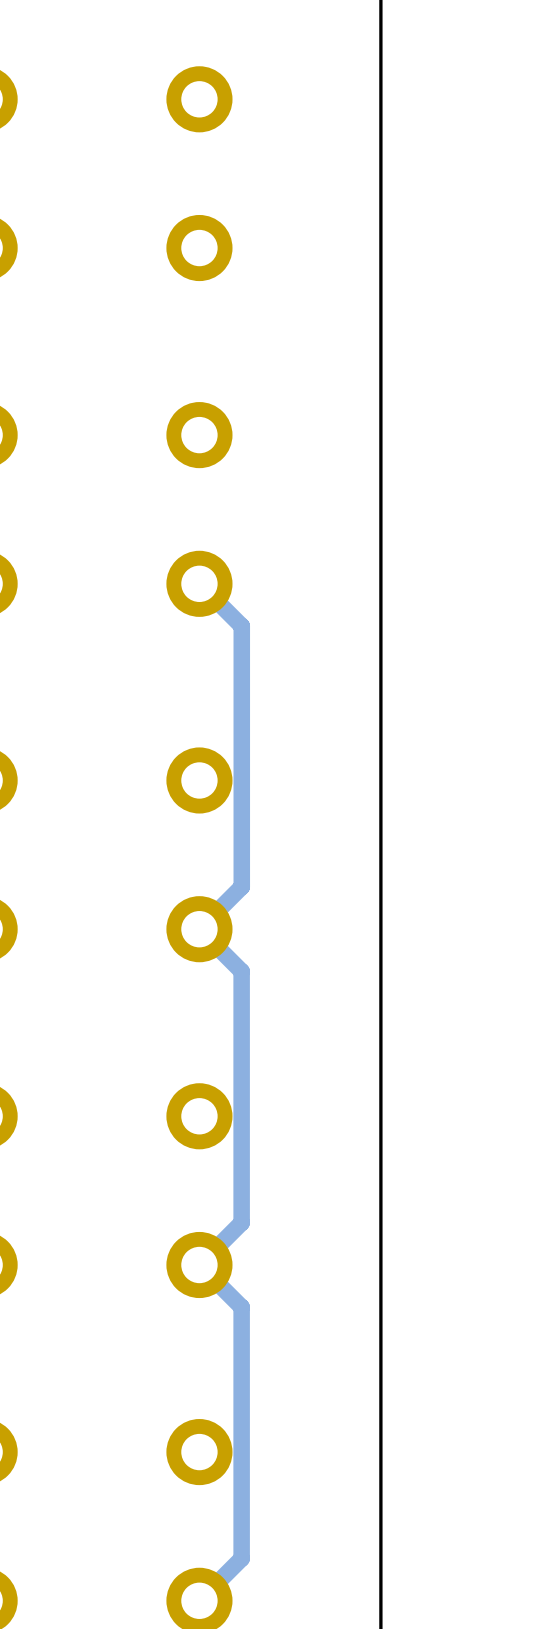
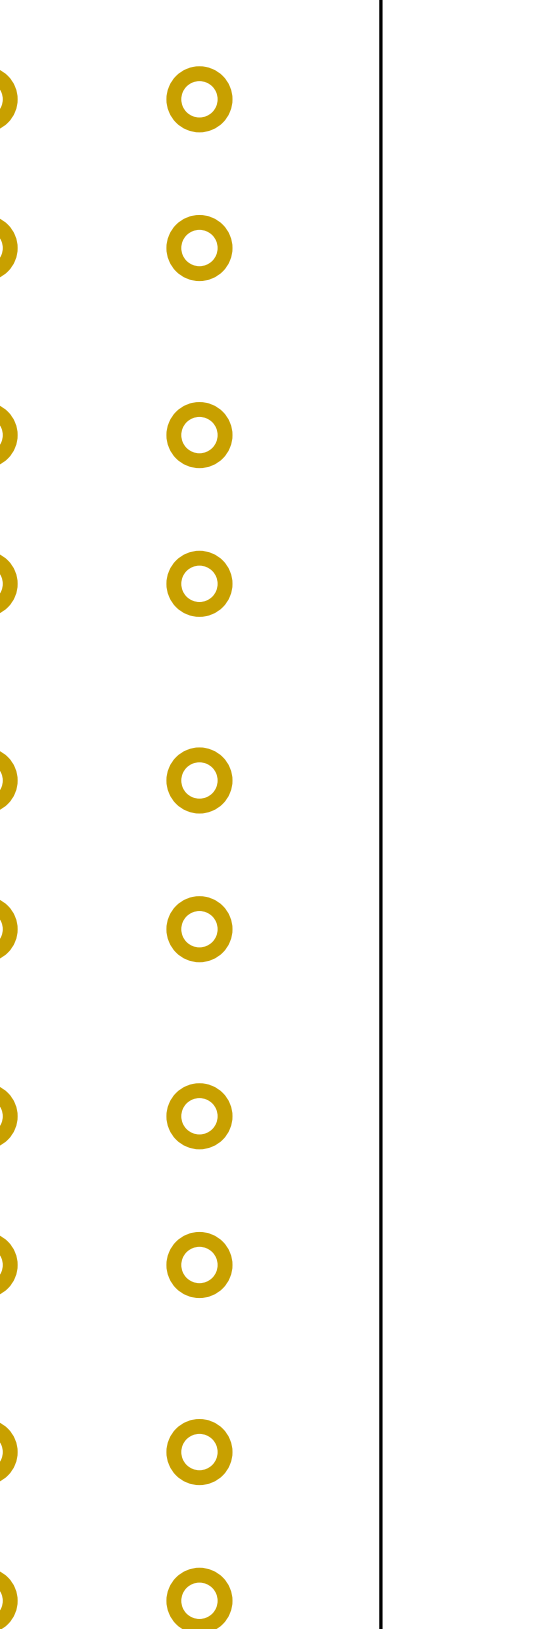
track: (199, 583) (241, 626) (241, 886) (199, 929) (241, 971) (241, 1222) (199, 1265) (241, 1307) (241, 1558) (199, 1600) -> none

